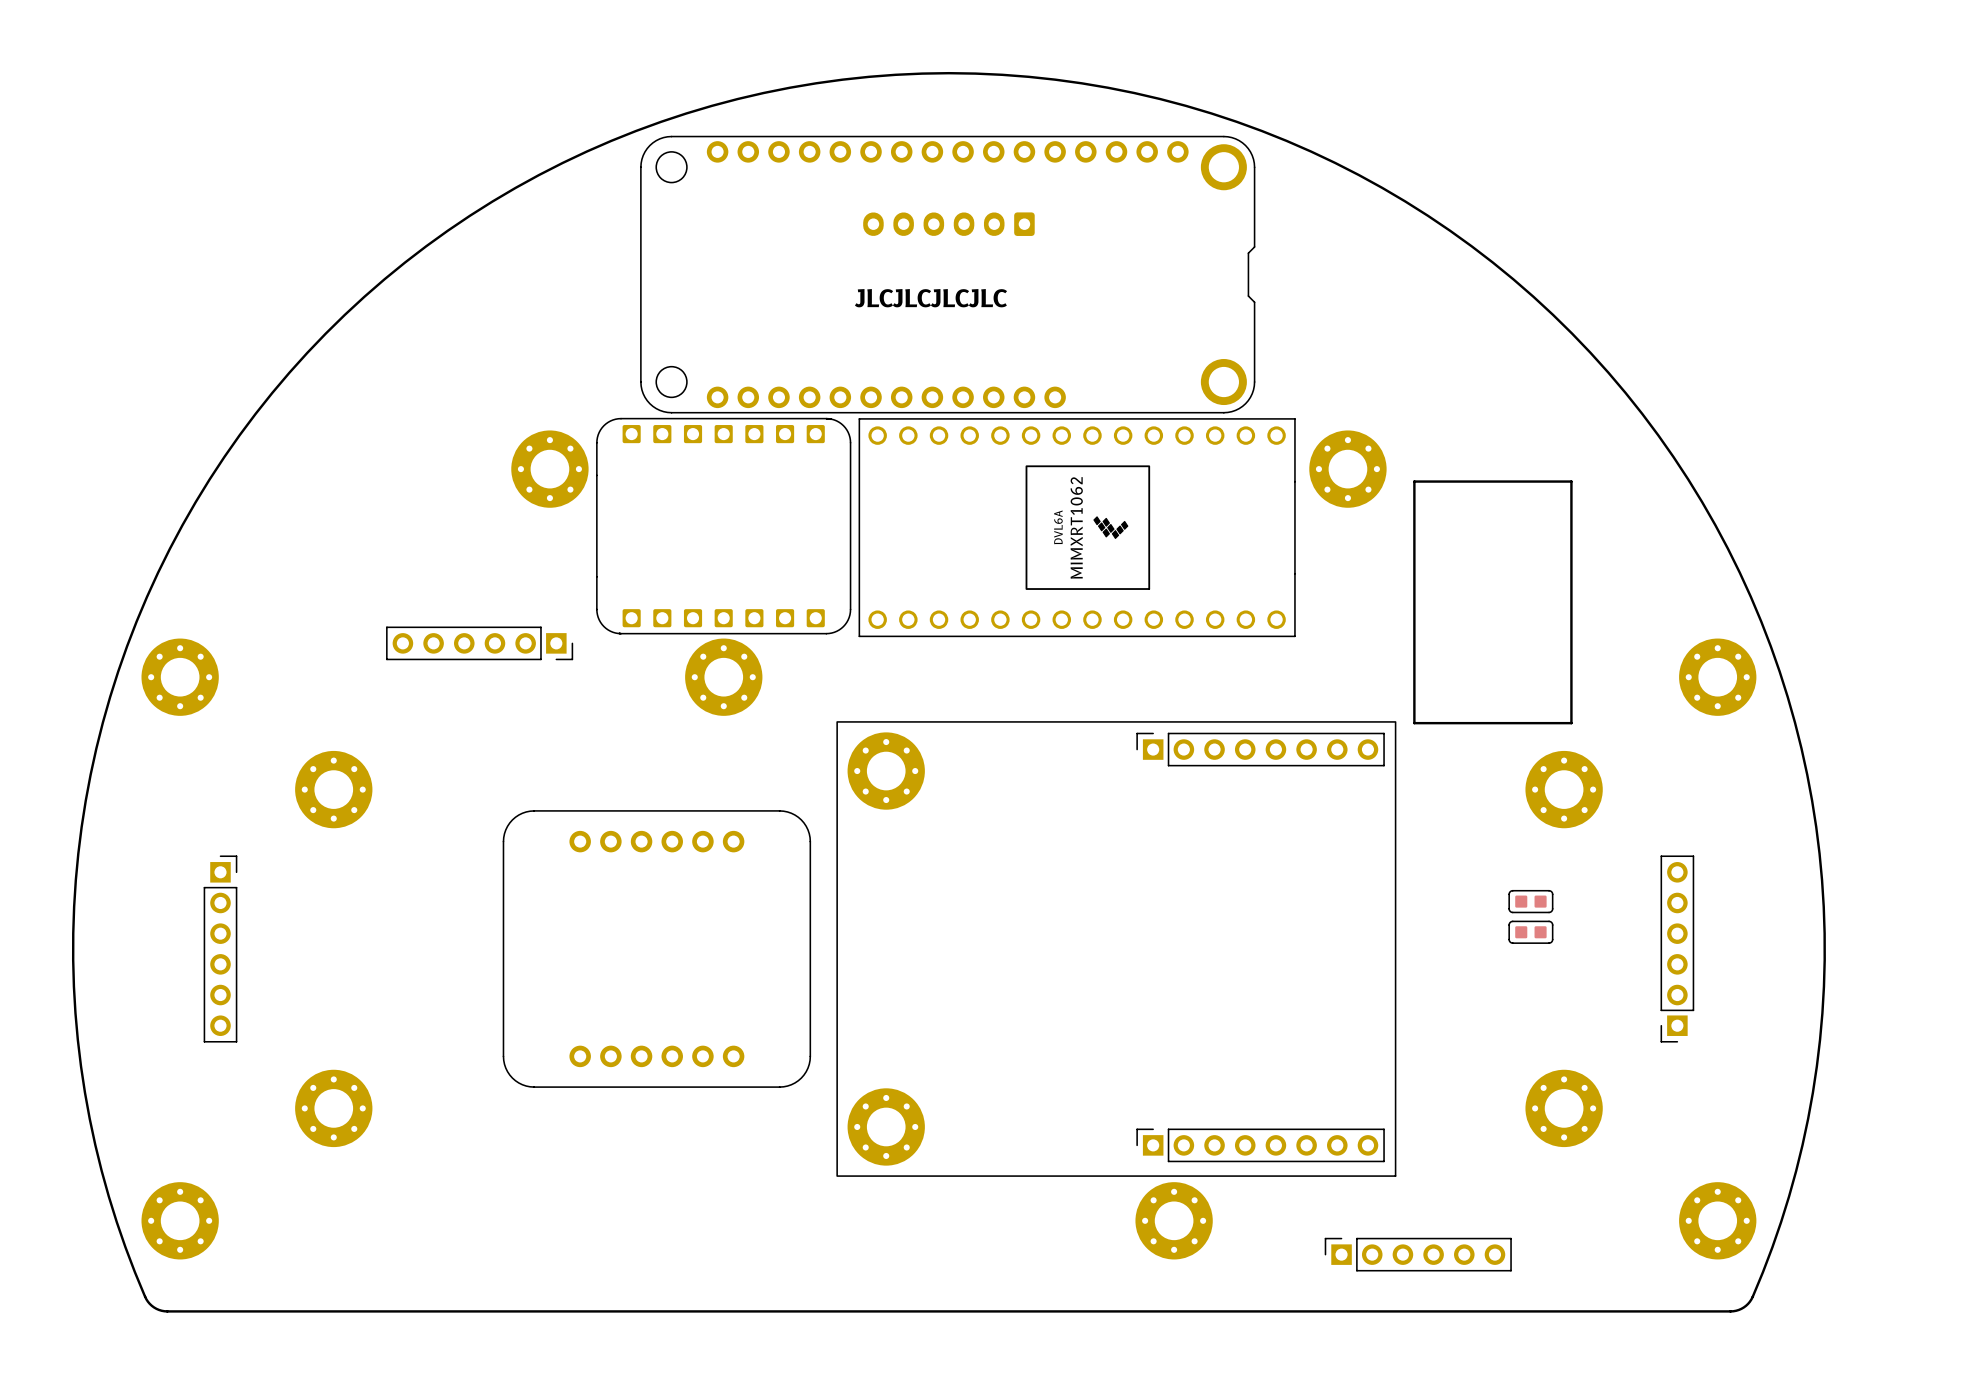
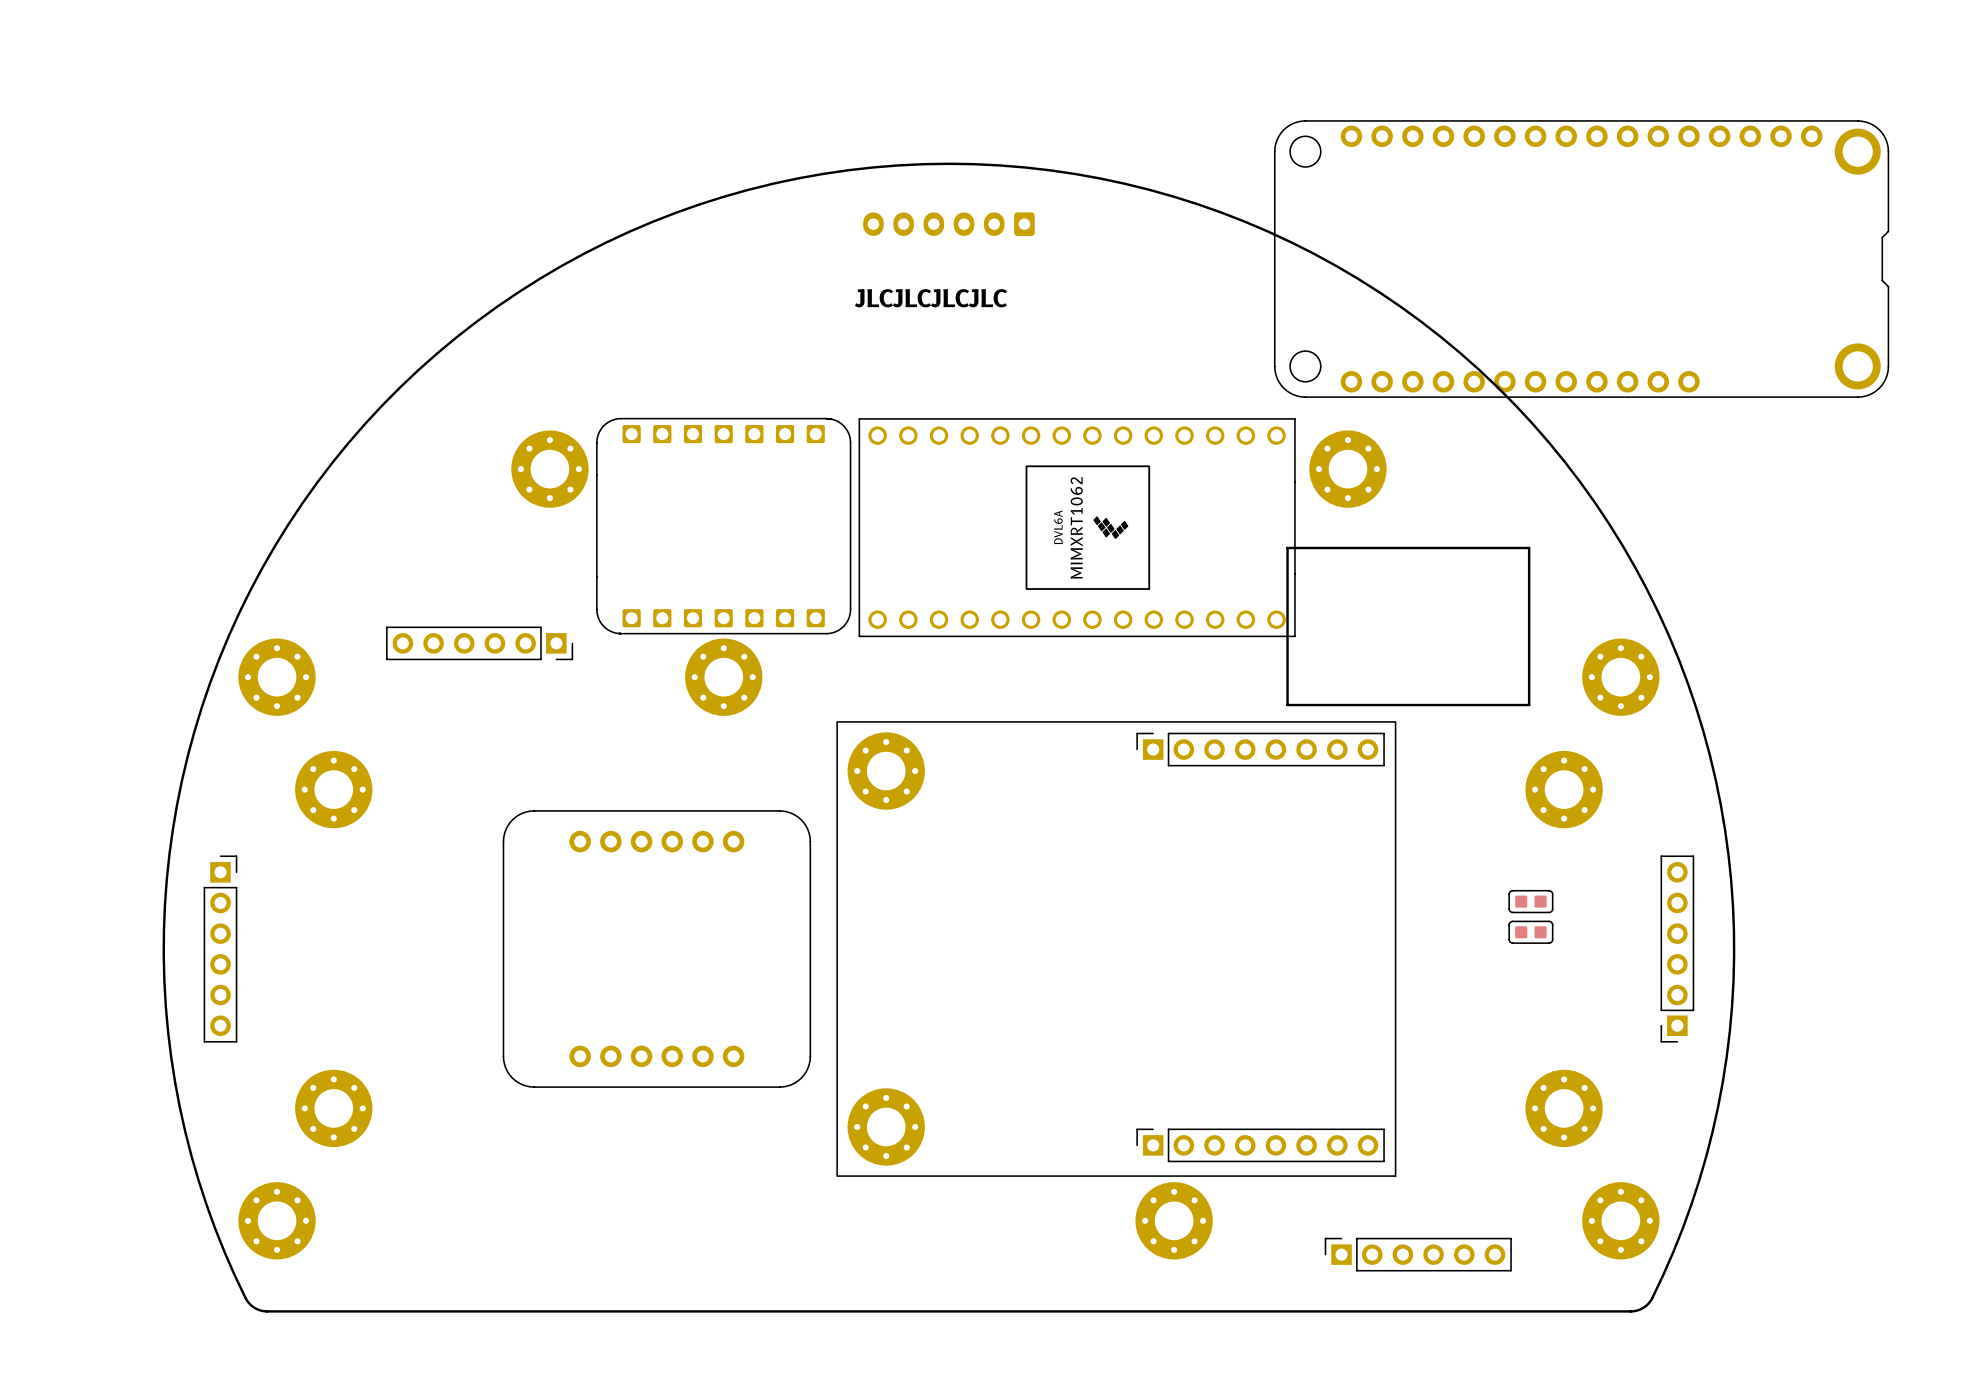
part: none -> (1581, 259)
part: (947, 274) -> none
board edge: (1414, 481) (1414, 723) (1571, 723) (1571, 481) (1414, 481) -> none
board edge: none -> (1287, 547) (1287, 705) (1529, 705) (1529, 547) (1287, 547)
part position: (180, 677) -> (277, 677)
part position: (1717, 677) -> (1620, 677)
part position: (180, 1220) -> (277, 1220)
part position: (1717, 1220) -> (1620, 1220)
board edge: (267, 1311) (164, 1311) (154, 1307) (147, 1301) (125, 1247) (101, 1170) (89, 1118) (77, 1039) (73, 960) (74, 906) (78, 853) (90, 774) (102, 722) (127, 646) (147, 596) (182, 525) (224, 457) (255, 413) (289, 372) (325, 333) (364, 296) (405, 262) (470, 215) (515, 187) (562, 162) (611, 140) (661, 121) (711, 105) (789, 87) (842, 79) (895, 74) (948, 73) (1002, 74) (1055, 79) (1108, 87) (1160, 99) (1211, 113) (1261, 131) (1335, 162) (1382, 187) (1449, 230) (1492, 262) (1533, 296) (1572, 333) (1608, 372) (1658, 435) (1688, 479) (1715, 525) (1750, 596) (1770, 646) (1787, 696) (1807, 774) (1819, 853) (1823, 906) (1823, 986) (1820, 1039) (1812, 1092) (1796, 1170) (1772, 1247) (1749, 1301) (1741, 1308) (1733, 1311) (1630, 1311) -> (267, 1311) (254, 1307) (245, 1297) (215, 1228) (191, 1156) (179, 1107) (168, 1031) (164, 981) (163, 930) (166, 880) (172, 830) (182, 780) (194, 731) (210, 683) (228, 635) (250, 590) (275, 545) (302, 503) (332, 462) (365, 423) (400, 387) (437, 353) (476, 321) (518, 292) (561, 265) (606, 242) (652, 221) (700, 204) (748, 189) (797, 178) (847, 170) (898, 165) (948, 163) (999, 165) (1049, 170) (1099, 178) (1149, 189) (1197, 204) (1245, 221) (1291, 242) (1336, 265) (1379, 292) (1420, 321) (1460, 353) (1497, 387) (1532, 423) (1565, 462) (1595, 503) (1622, 545) (1647, 590) (1669, 635) (1687, 683) (1703, 731) (1715, 780) (1725, 830) (1731, 880) (1733, 930) (1733, 981) (1726, 1057) (1718, 1107) (1706, 1156) (1682, 1228) (1652, 1297) (1643, 1307) (1630, 1311)

